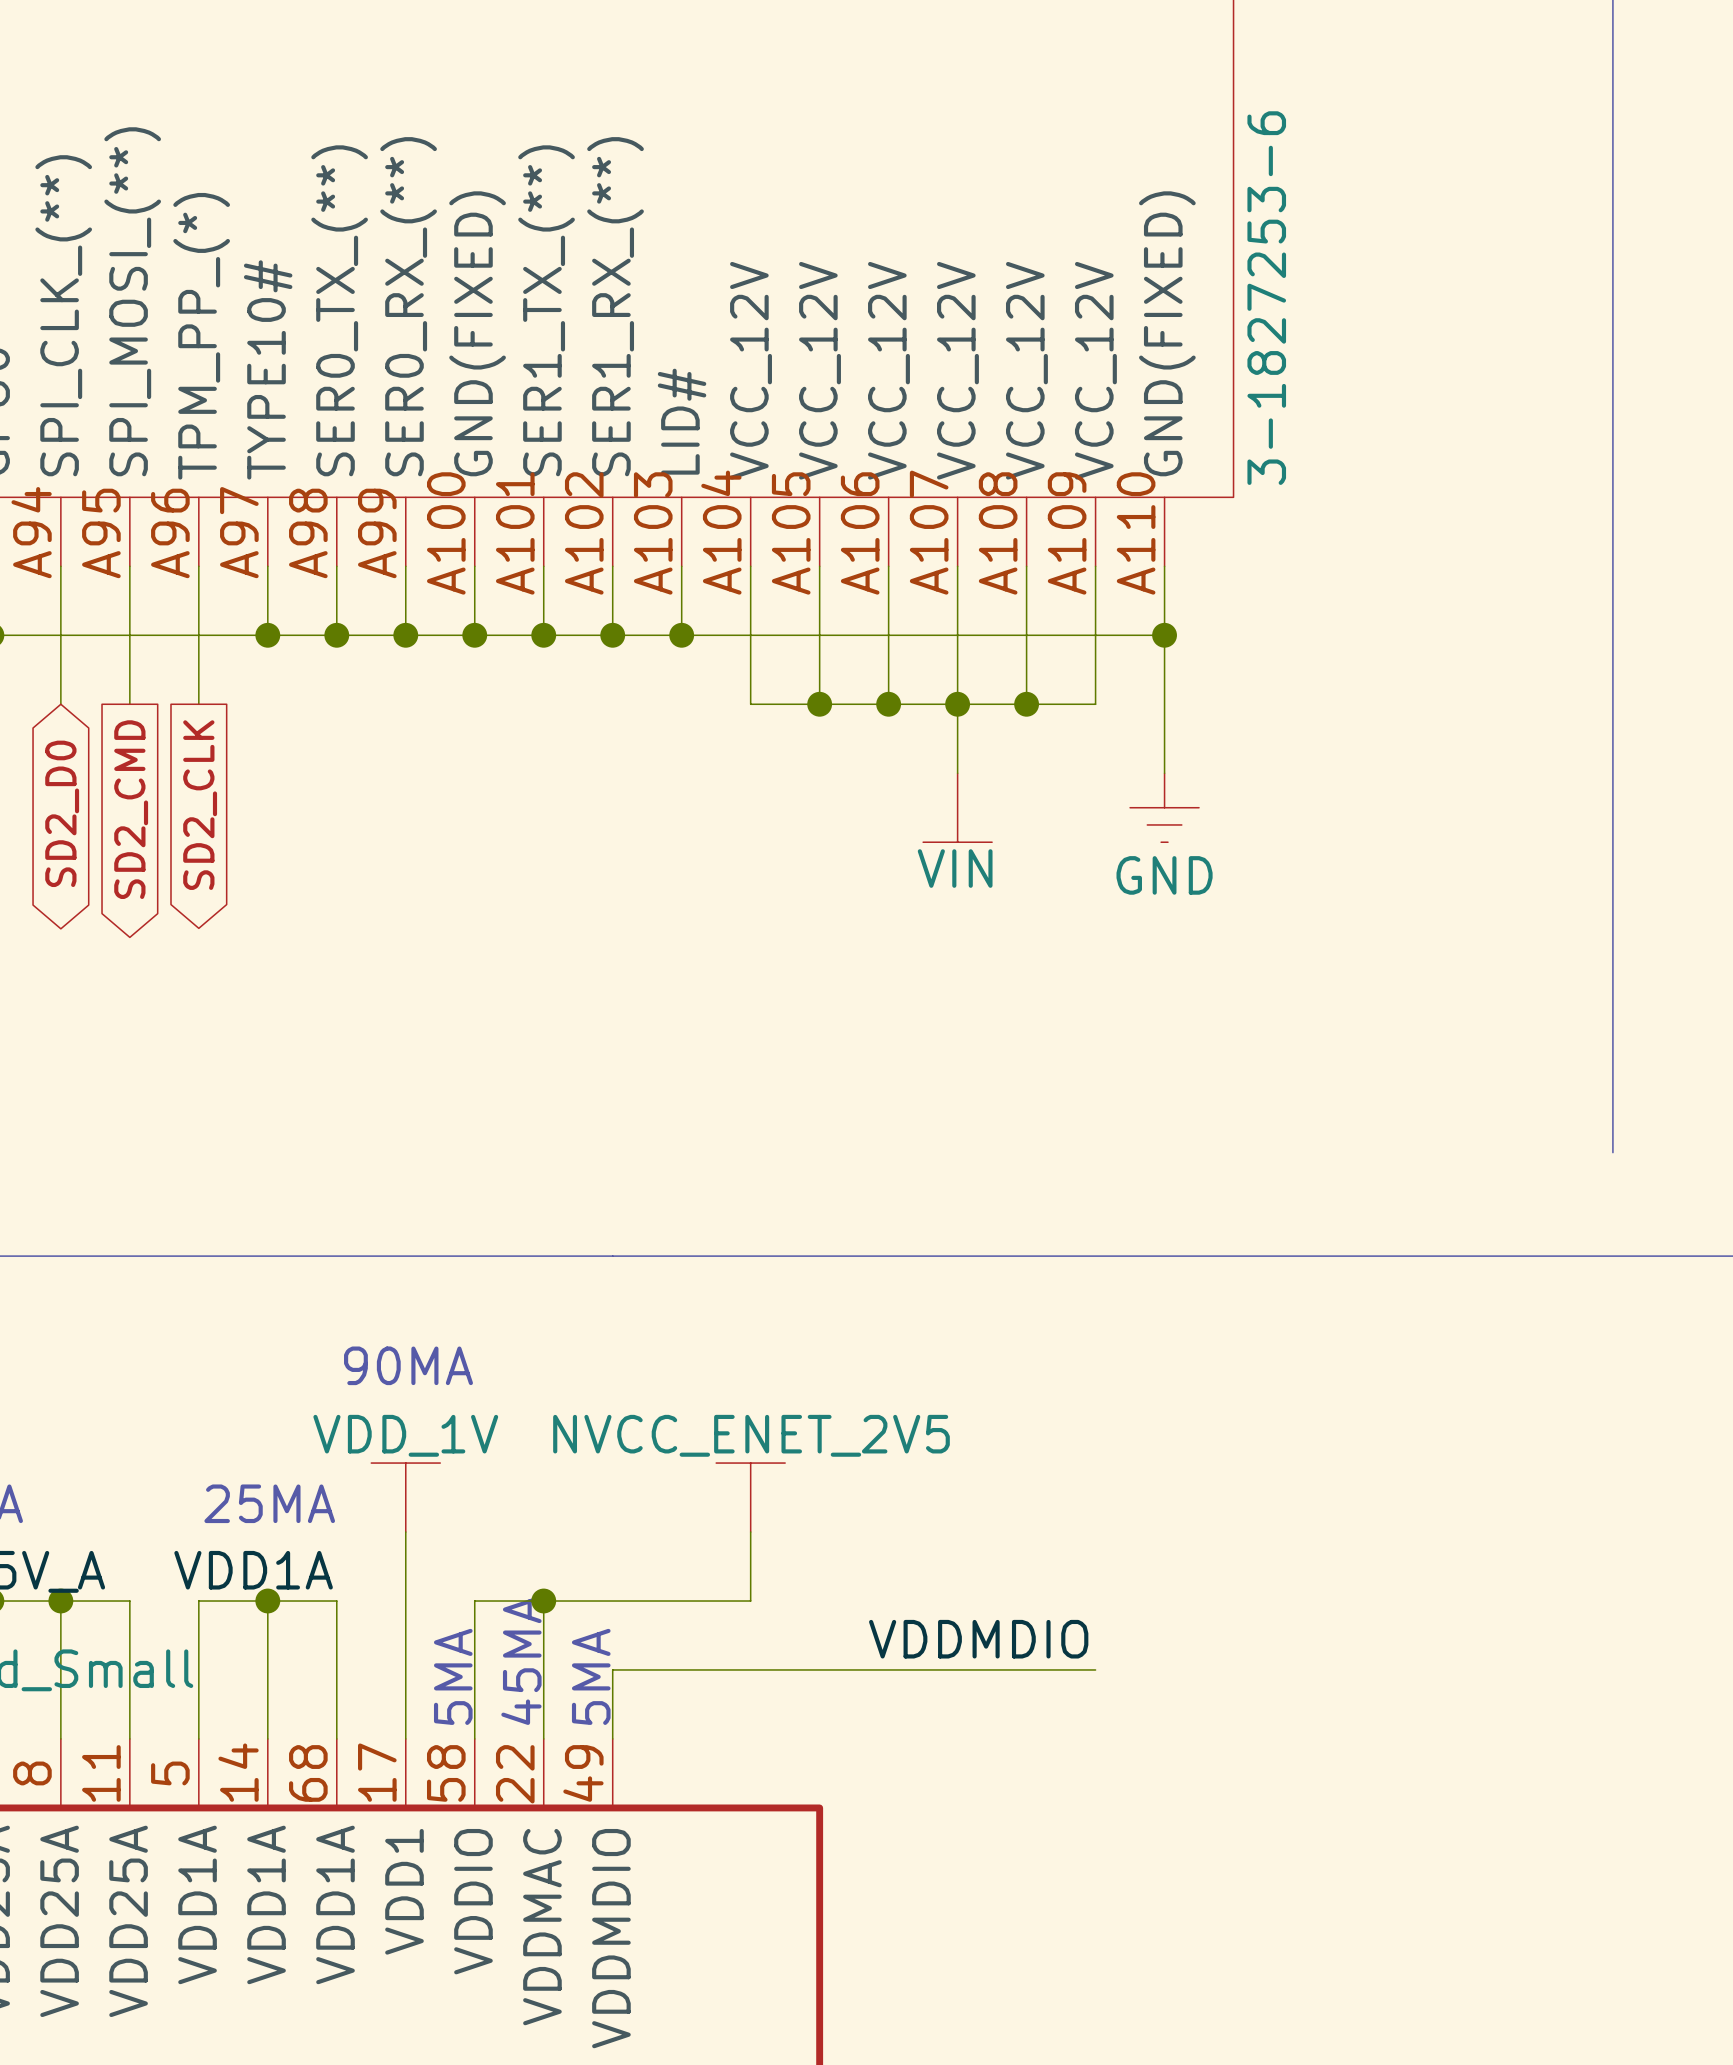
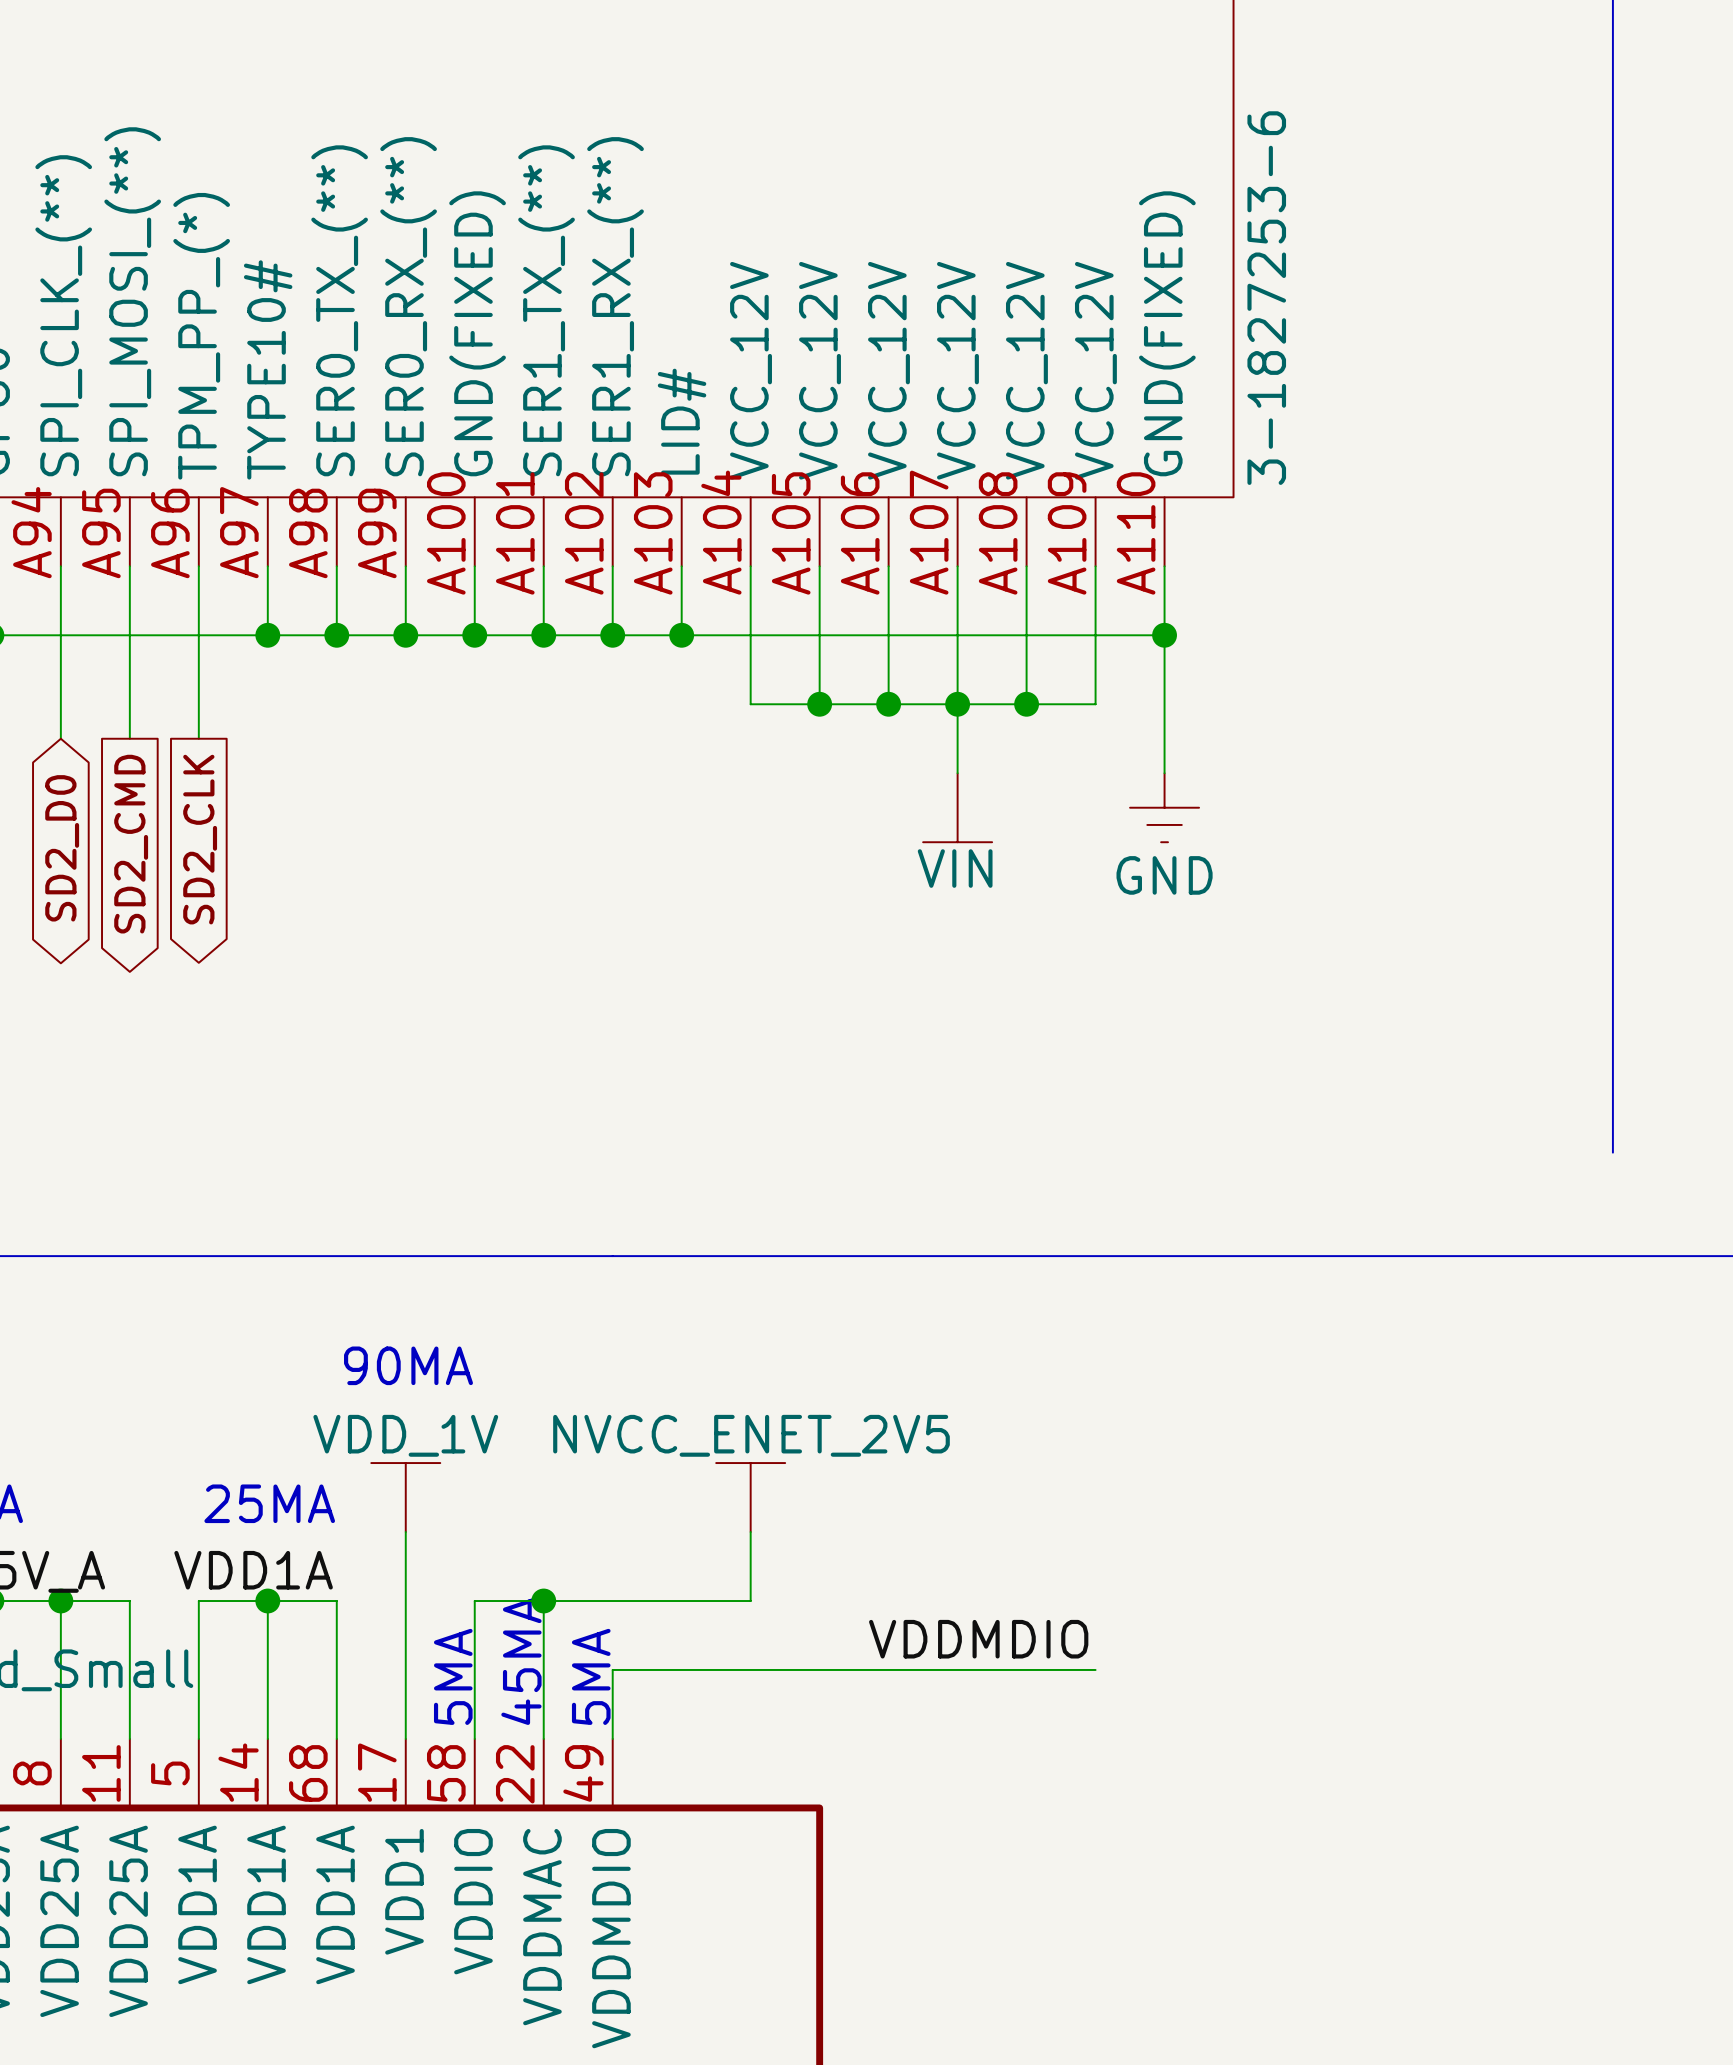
wire: none -> (60, 704) (60, 738)
wire: none -> (129, 704) (129, 738)
wire: none -> (198, 704) (198, 738)
global label position: SD2_CLK (200, 805) -> SD2_CLK (200, 839)
global label position: SD2_CMD (131, 809) -> SD2_CMD (131, 844)
global label position: SD2_D0 (62, 813) -> SD2_D0 (62, 848)

